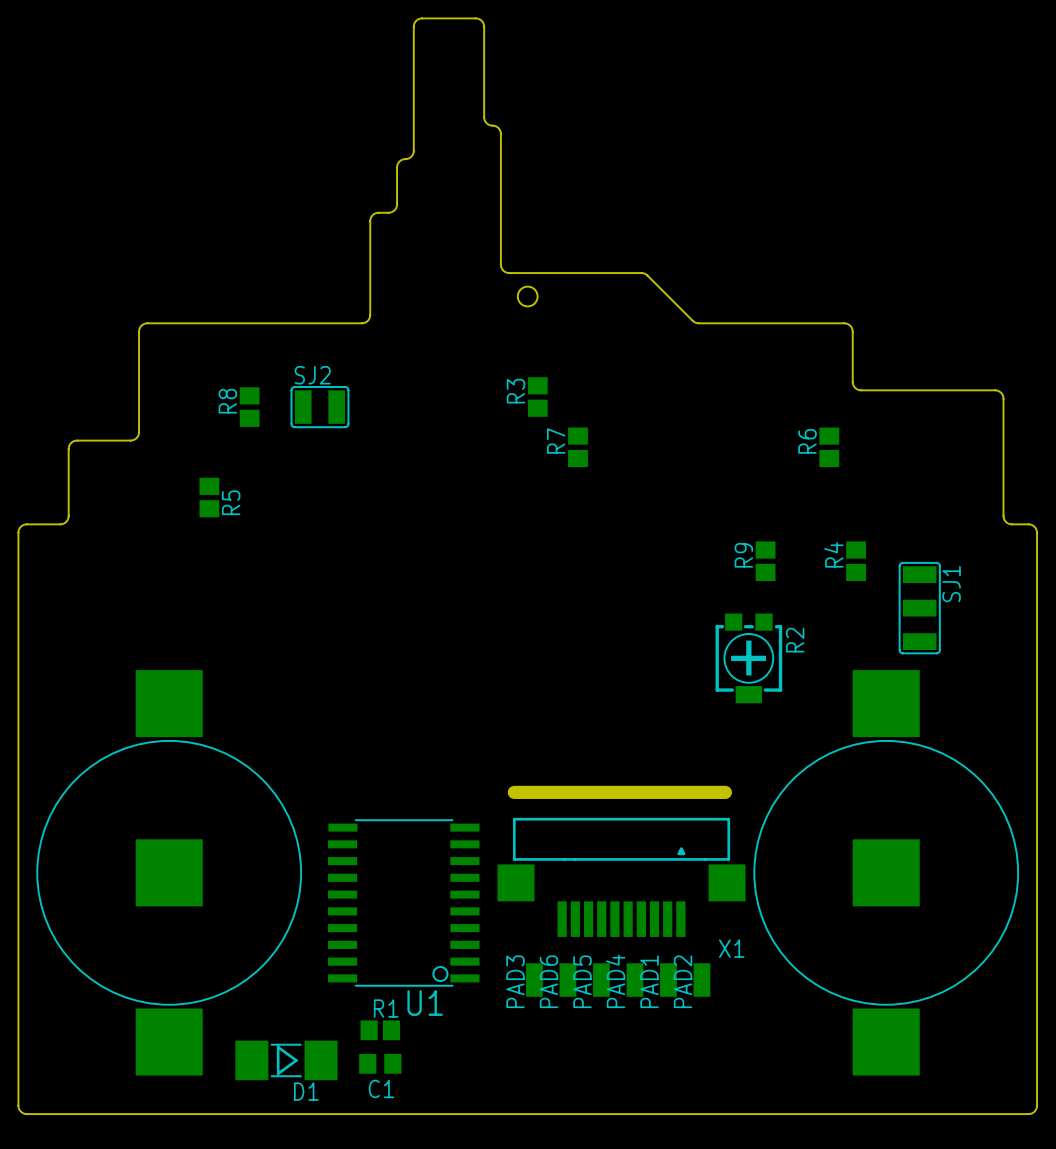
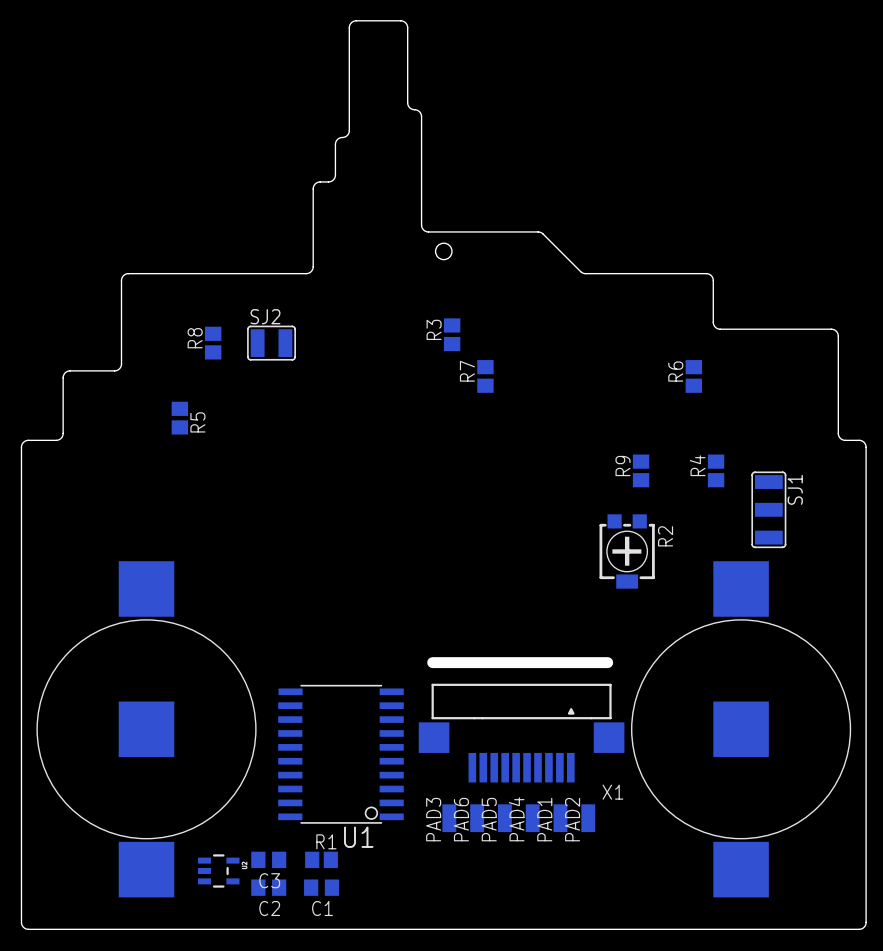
C3: none -> (268, 859)
part: none -> (218, 870)
D1: (286, 1060) -> none
C2: none -> (268, 887)

